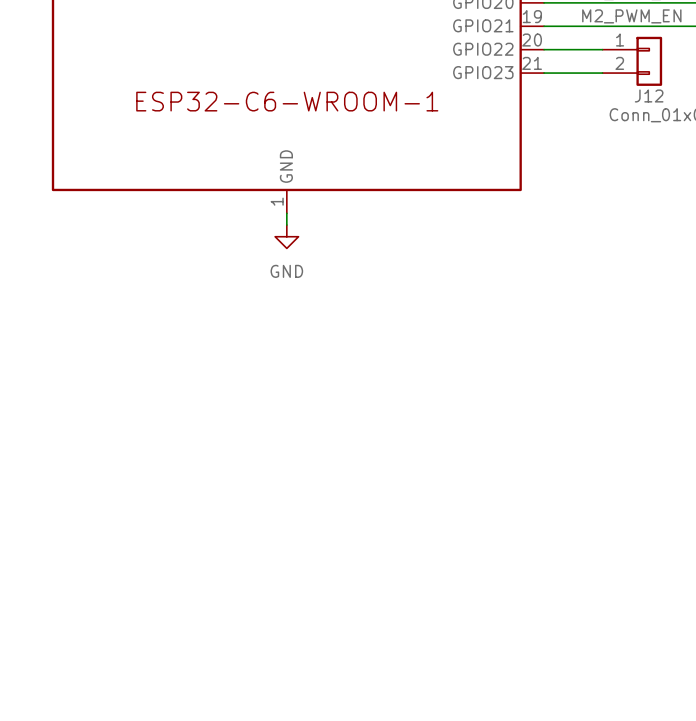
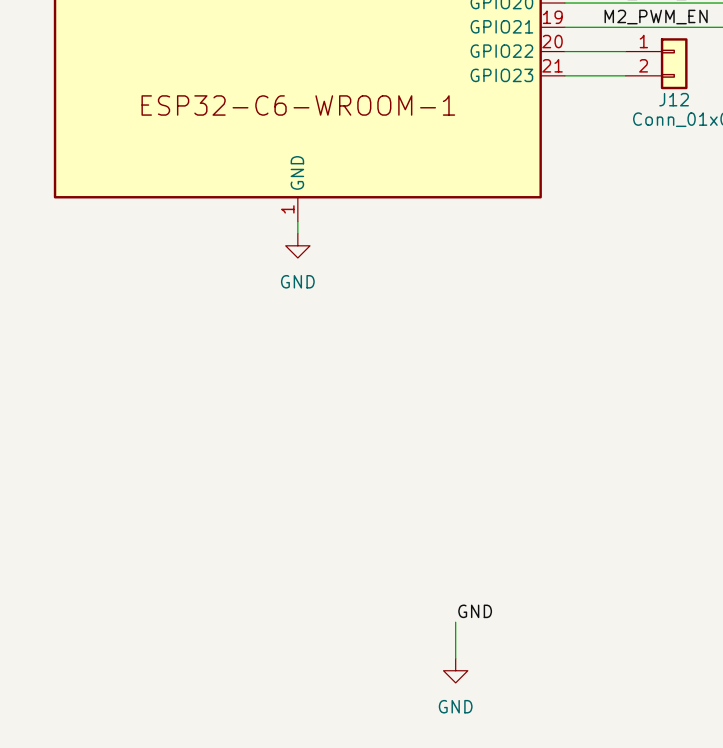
label: none -> GND (475, 611)
wire: none -> (455, 622) (455, 658)
power symbol: none -> GND (455, 670)

